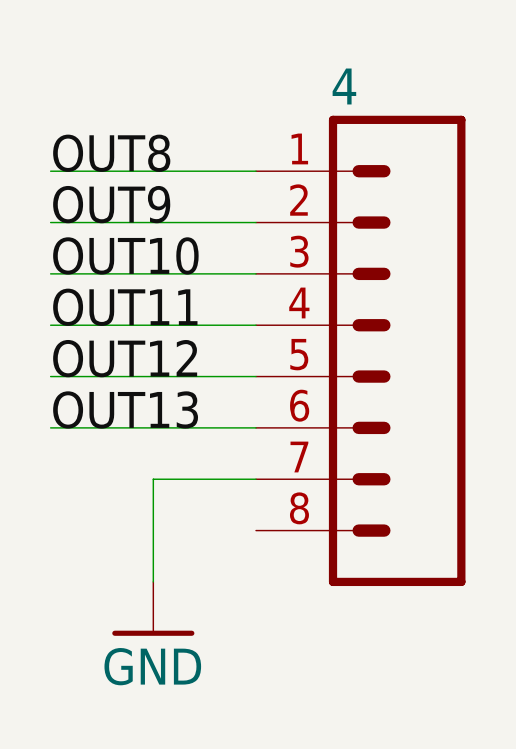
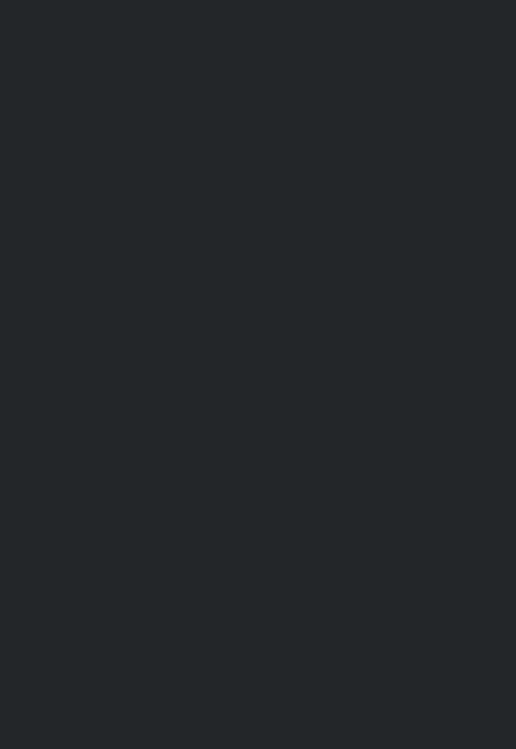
label: OUT8 (111, 153) -> none
wire: (50, 171) (256, 171) -> none
label: OUT9 (111, 204) -> none
wire: (50, 222) (256, 222) -> none
label: OUT10 (125, 255) -> none
wire: (50, 273) (256, 273) -> none
label: OUT11 (125, 307) -> none
wire: (50, 325) (256, 325) -> none
4: (360, 350) -> none
label: OUT12 (125, 358) -> none
wire: (50, 376) (256, 376) -> none
label: OUT13 (125, 409) -> none
wire: (50, 427) (256, 427) -> none
wire: (256, 479) (153, 479) (153, 581) -> none
power symbol: GND (153, 608) -> none

